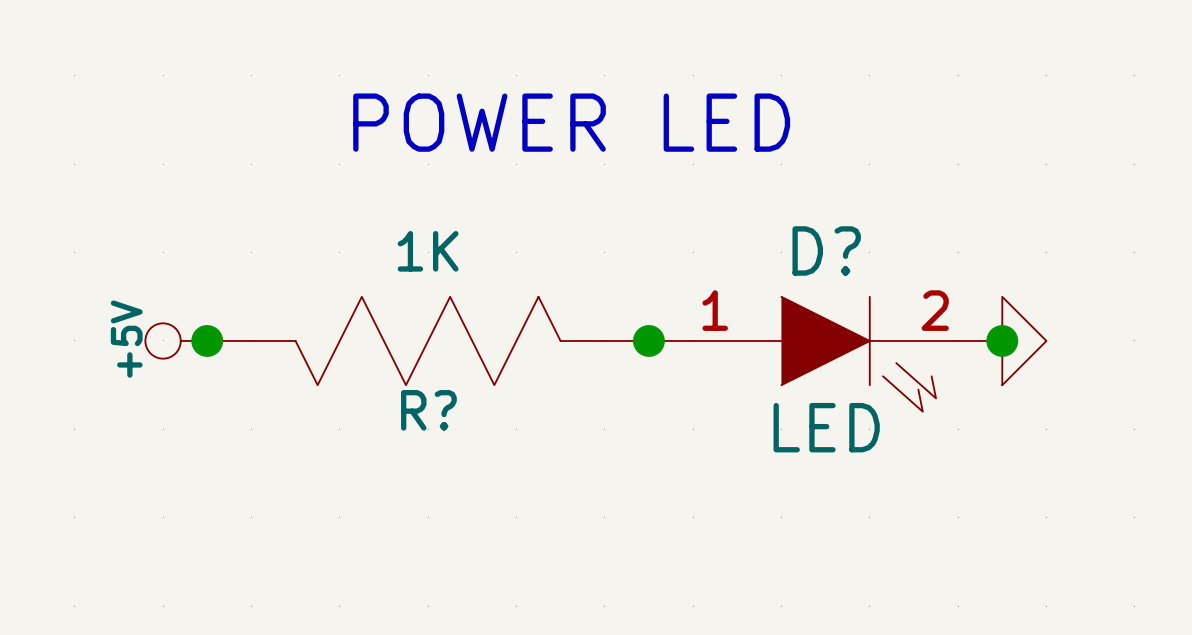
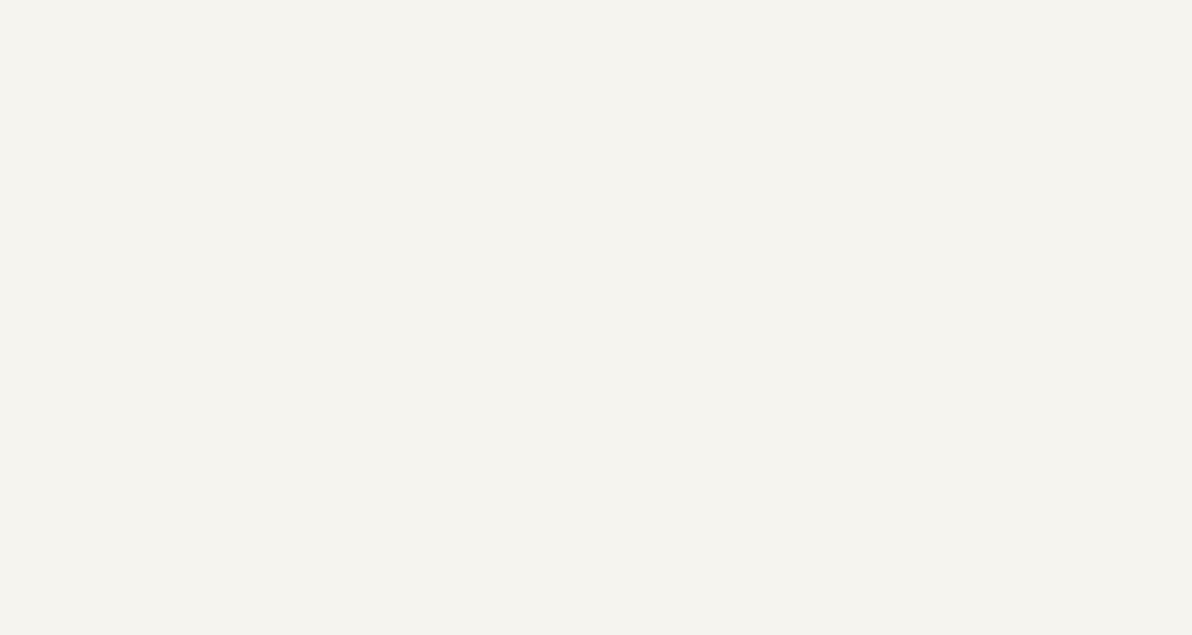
text: POWER LED (571, 122) -> none
power symbol: +5V (176, 340) -> none
junction: (207, 340) -> none
R?: 1K (428, 340) -> none
junction: (648, 340) -> none
junction: (1002, 340) -> none
power symbol: (1024, 340) -> none
D?: LED (825, 354) -> none

